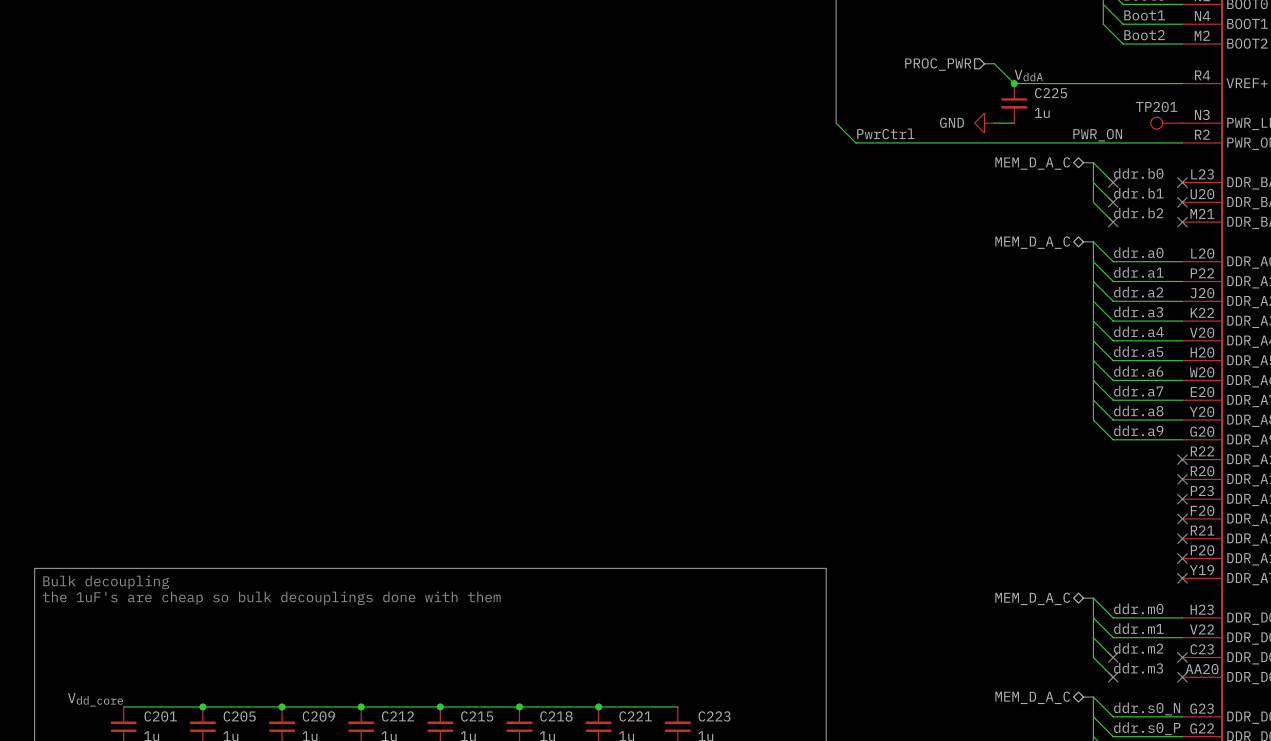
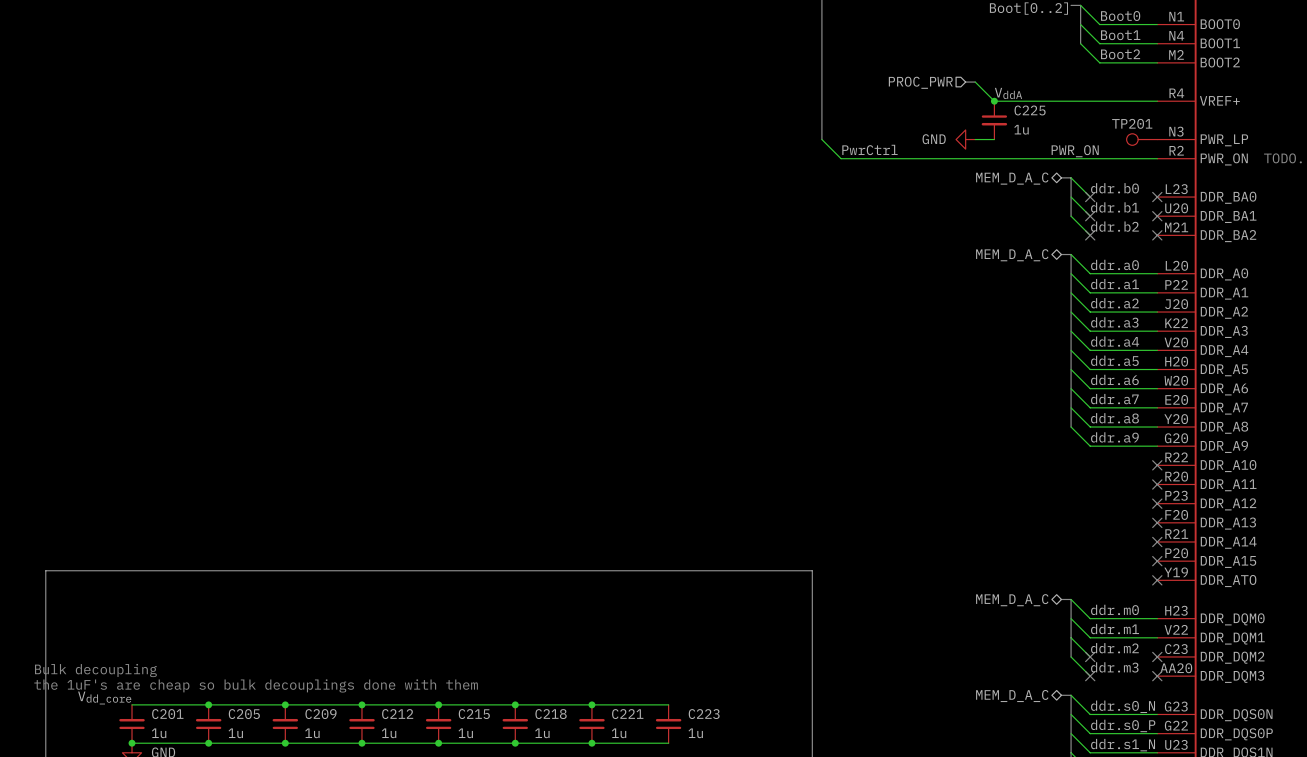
text position: Bulk decoupling (106, 582) -> Bulk decoupling (95, 670)
text position: the 1uF's are cheap so bulk decouplings done with them (271, 598) -> the 1uF's are cheap so bulk decouplings done with them (256, 685)

